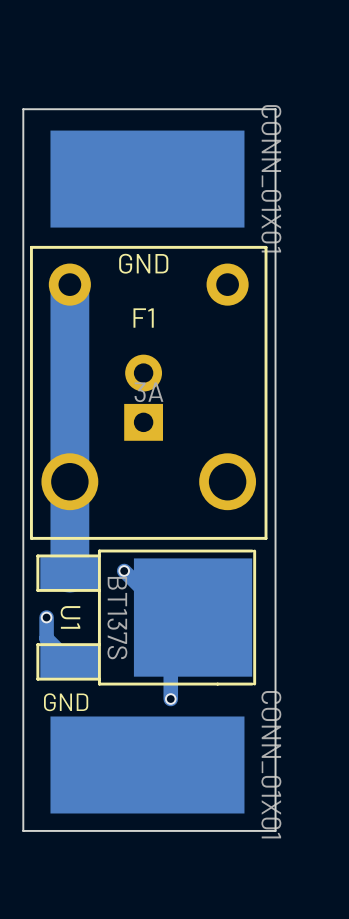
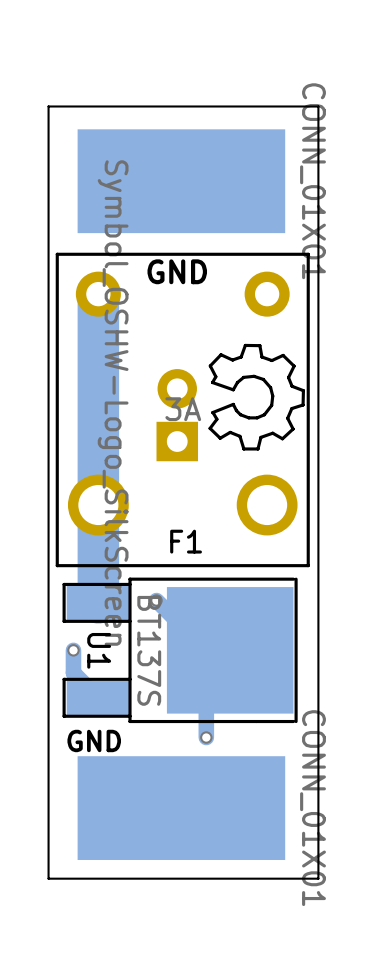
F1 name position: F1 (143, 318) -> F1 (186, 541)
drawing: none -> [208, 343, 306, 451]

